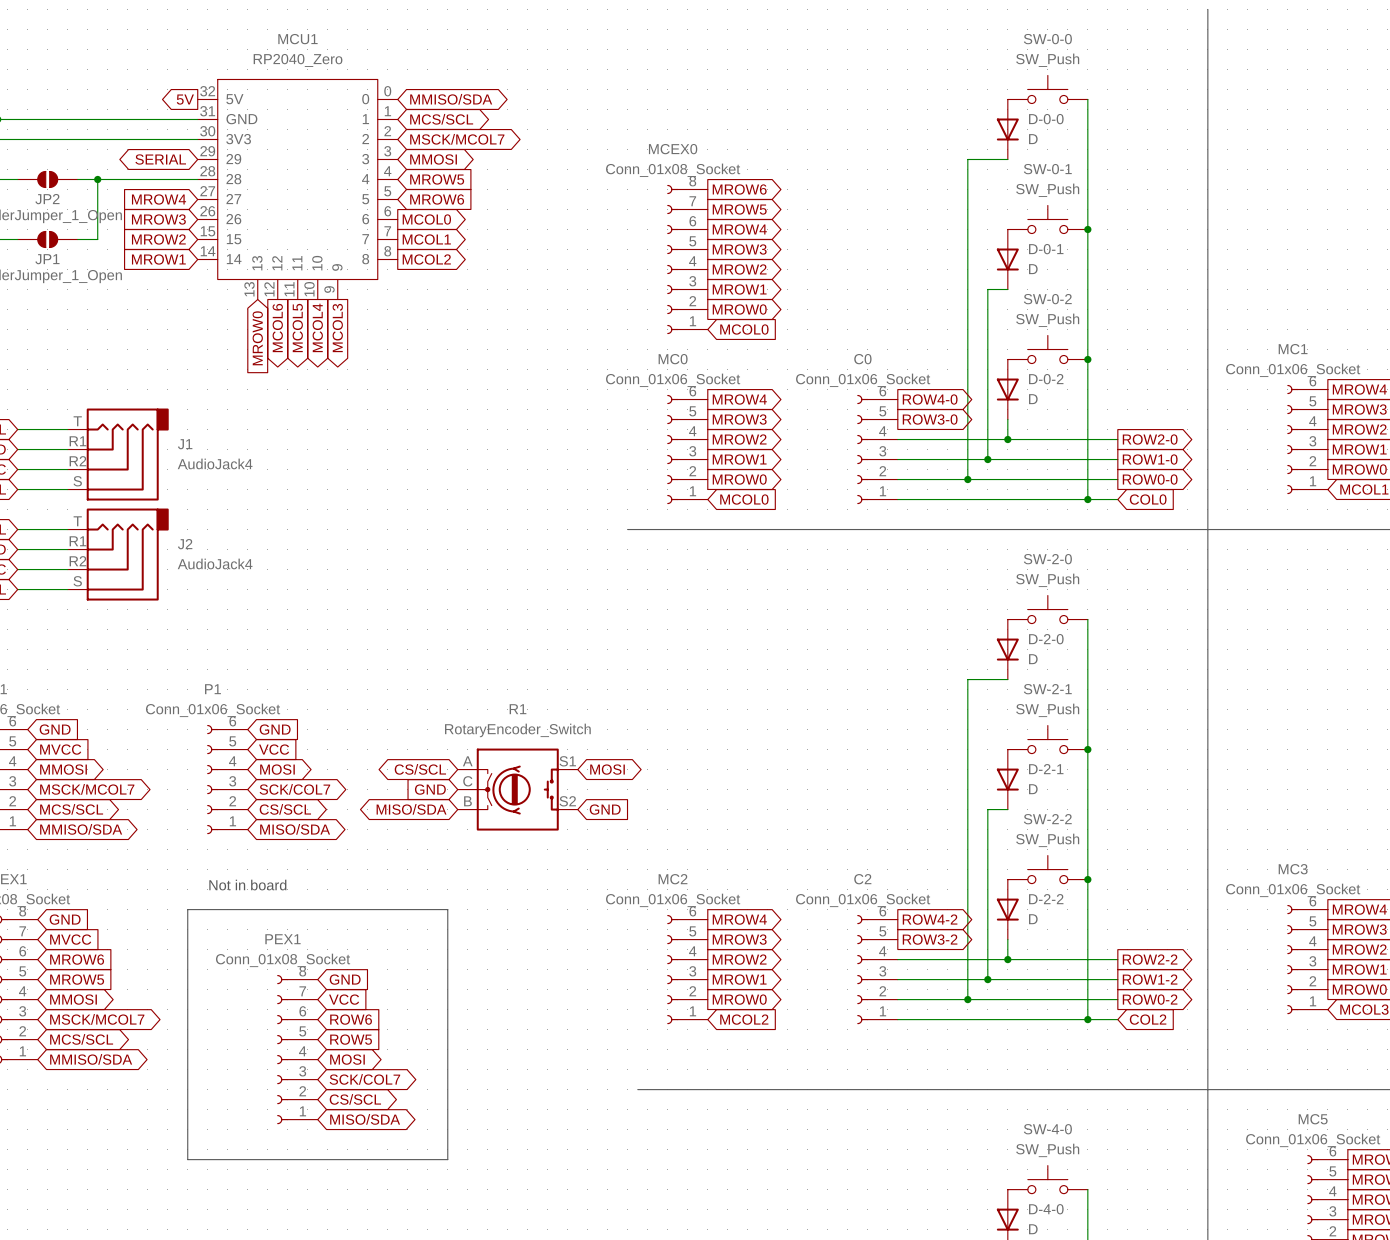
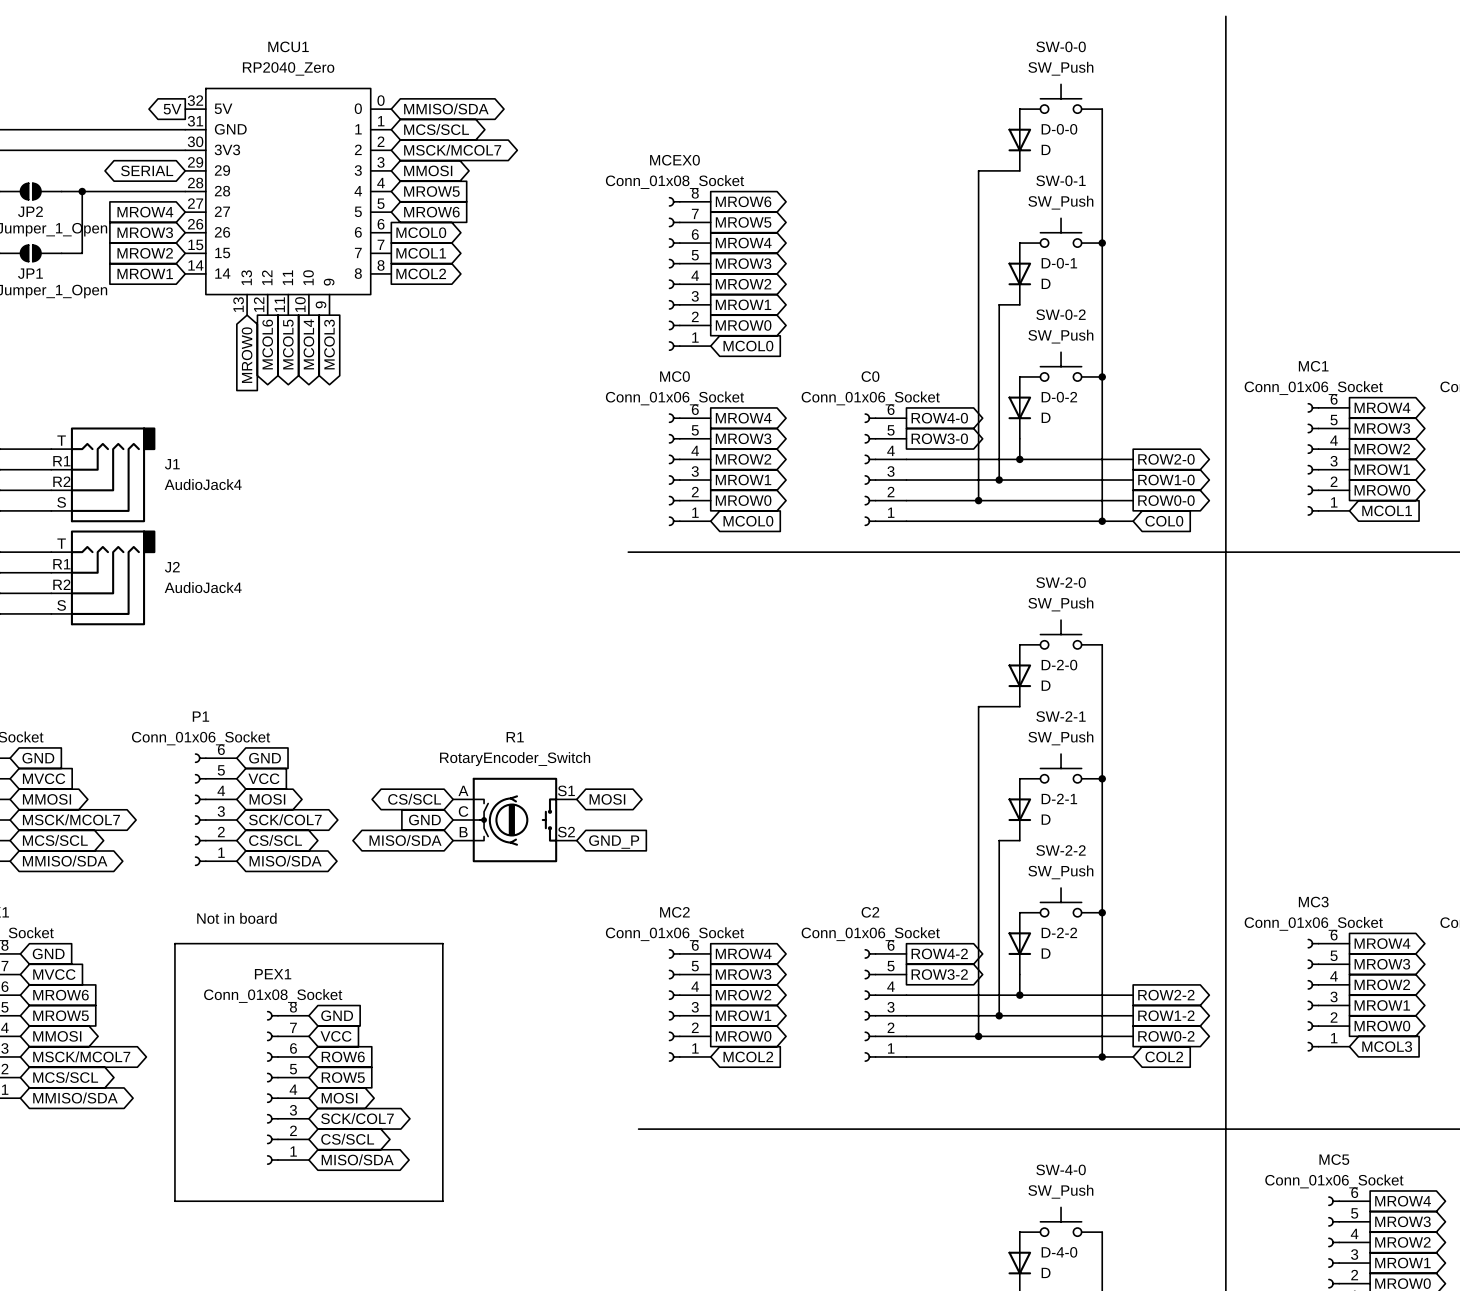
global label: GND (605, 809) -> GND_P (614, 842)

